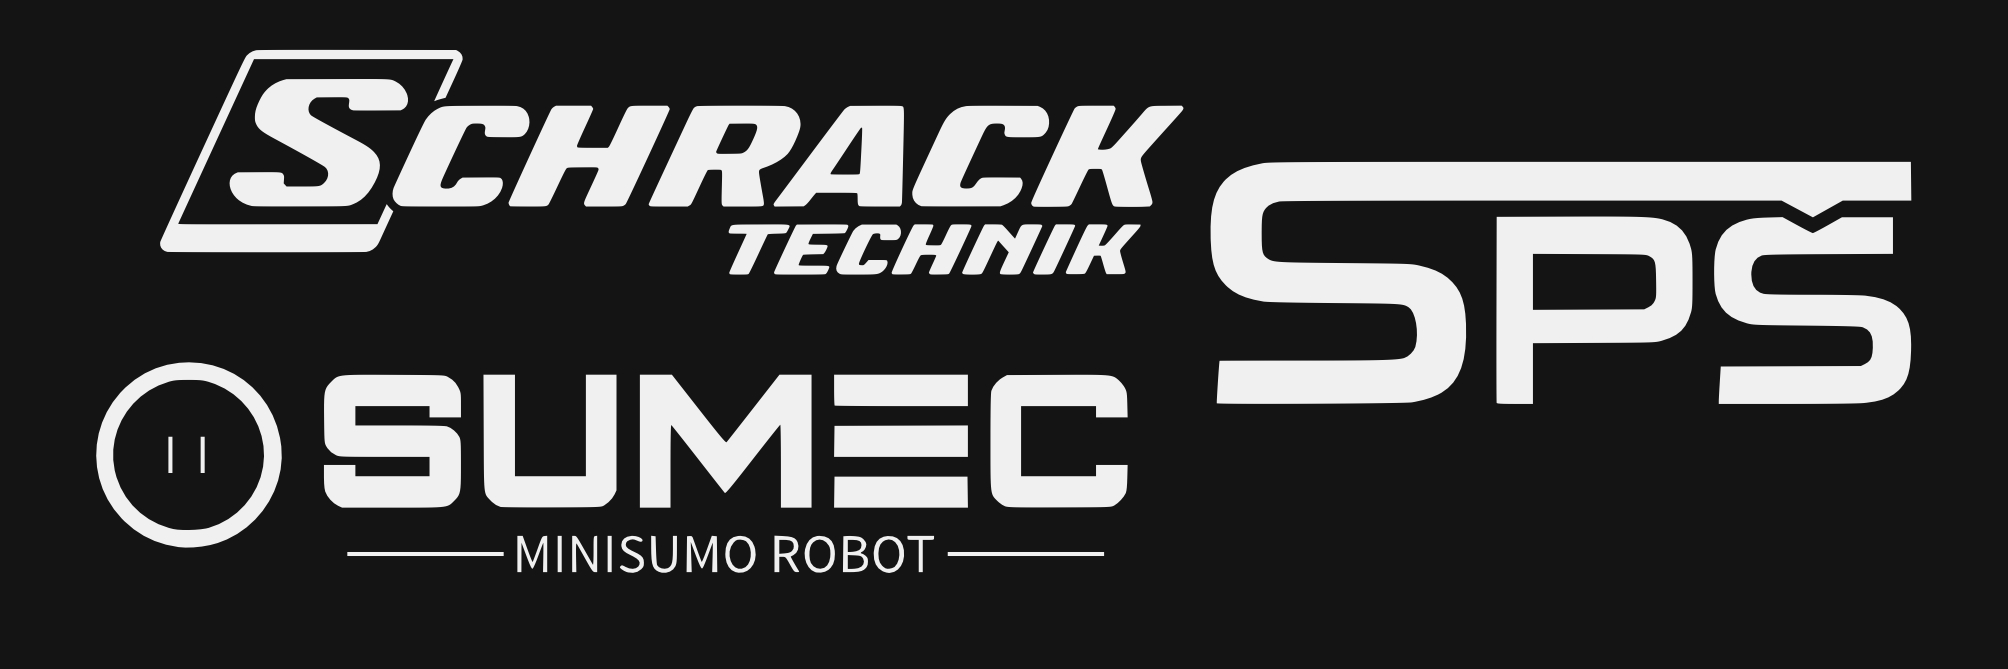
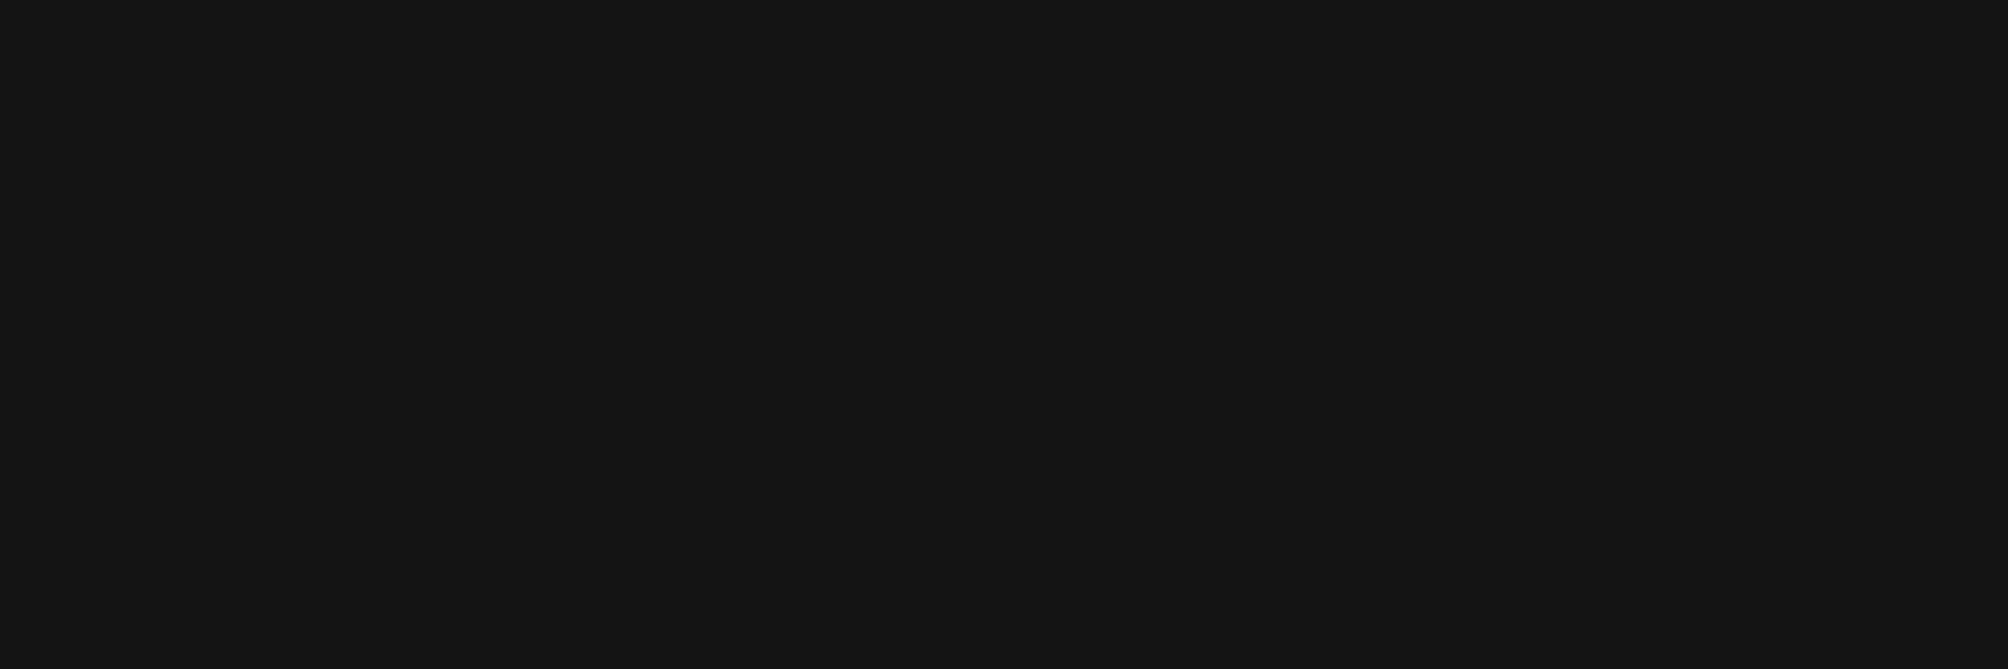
drawing: [160, 49, 1912, 404] -> none
drawing: [96, 362, 1128, 573] -> none

